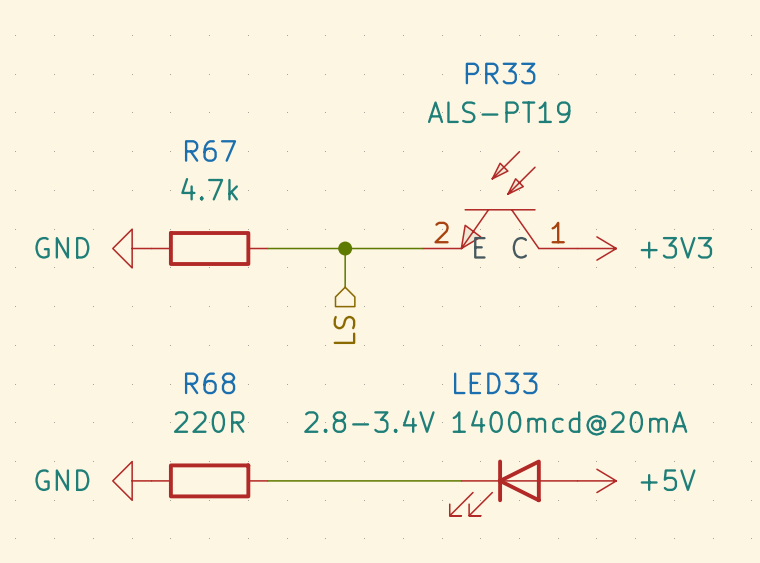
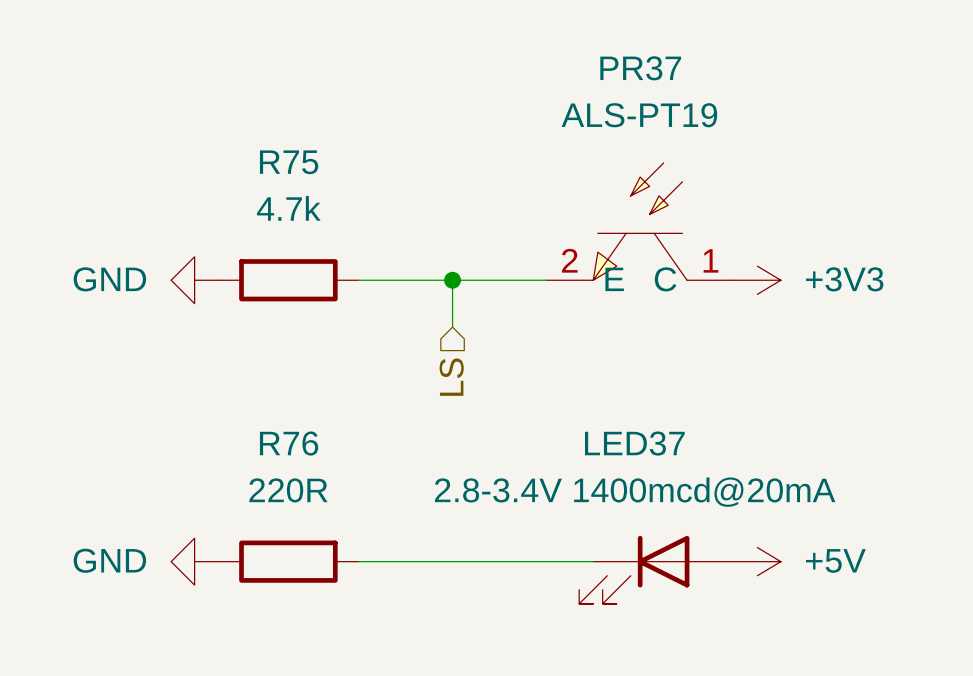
PR33 name: PR33 (500, 73) -> PR37 (640, 68)
R67 name: R67 (210, 150) -> R75 (289, 162)
R68 name: R68 (210, 383) -> R76 (289, 443)
LED33 name: LED33 (495, 383) -> LED37 (634, 443)

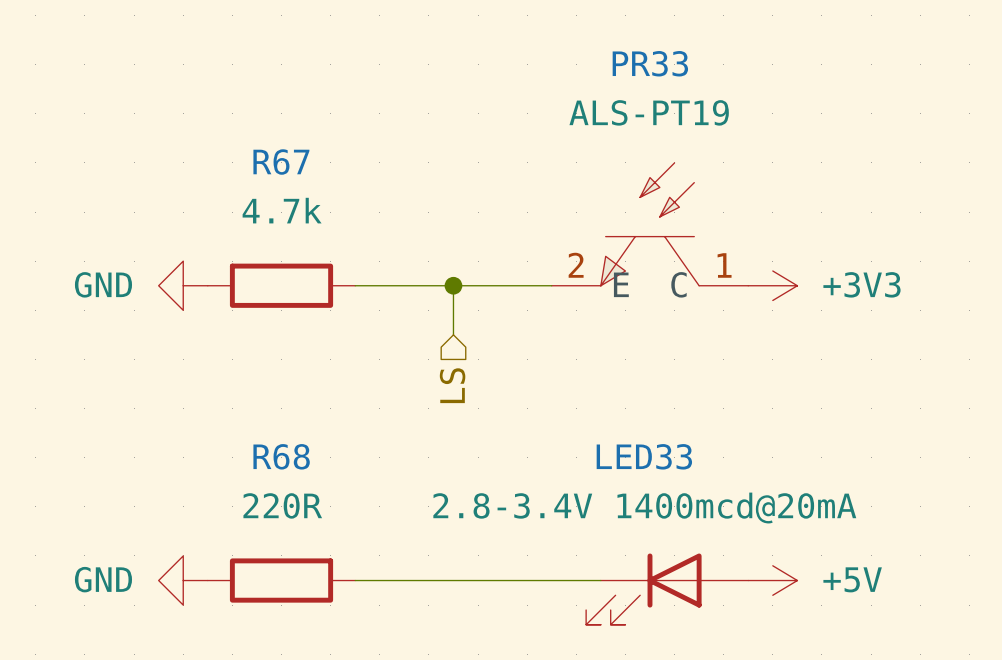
PR37 name: PR37 (640, 68) -> PR33 (650, 63)
R75 name: R75 (289, 162) -> R67 (281, 162)
R76 name: R76 (289, 443) -> R68 (281, 456)
LED37 name: LED37 (634, 443) -> LED33 (644, 456)

